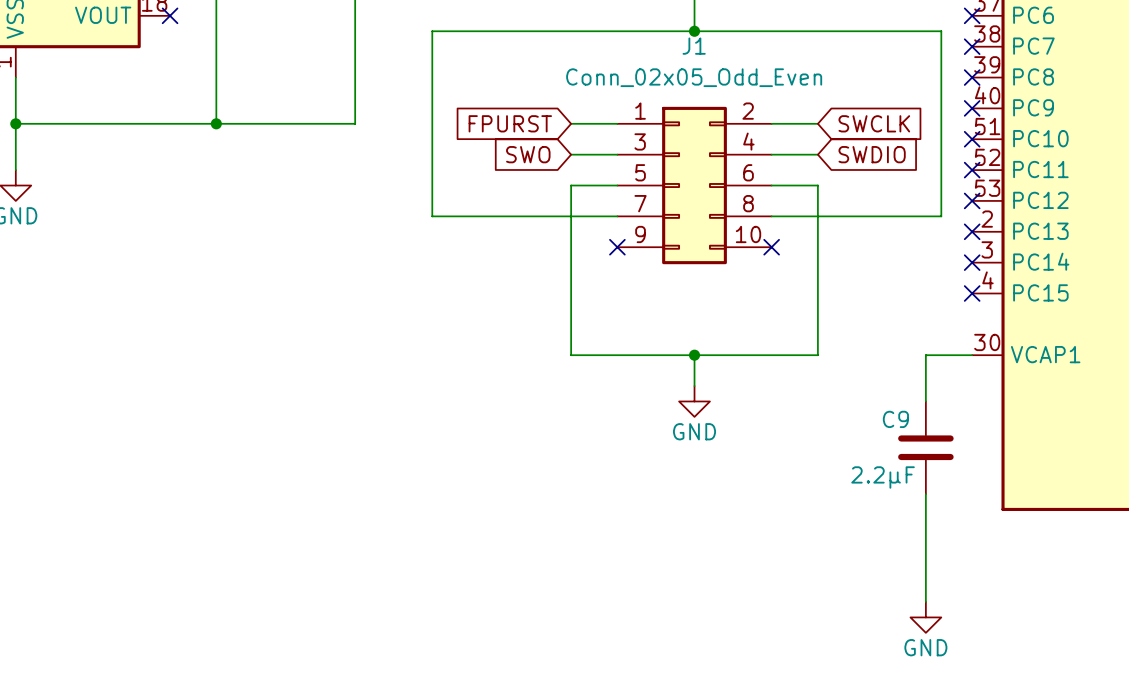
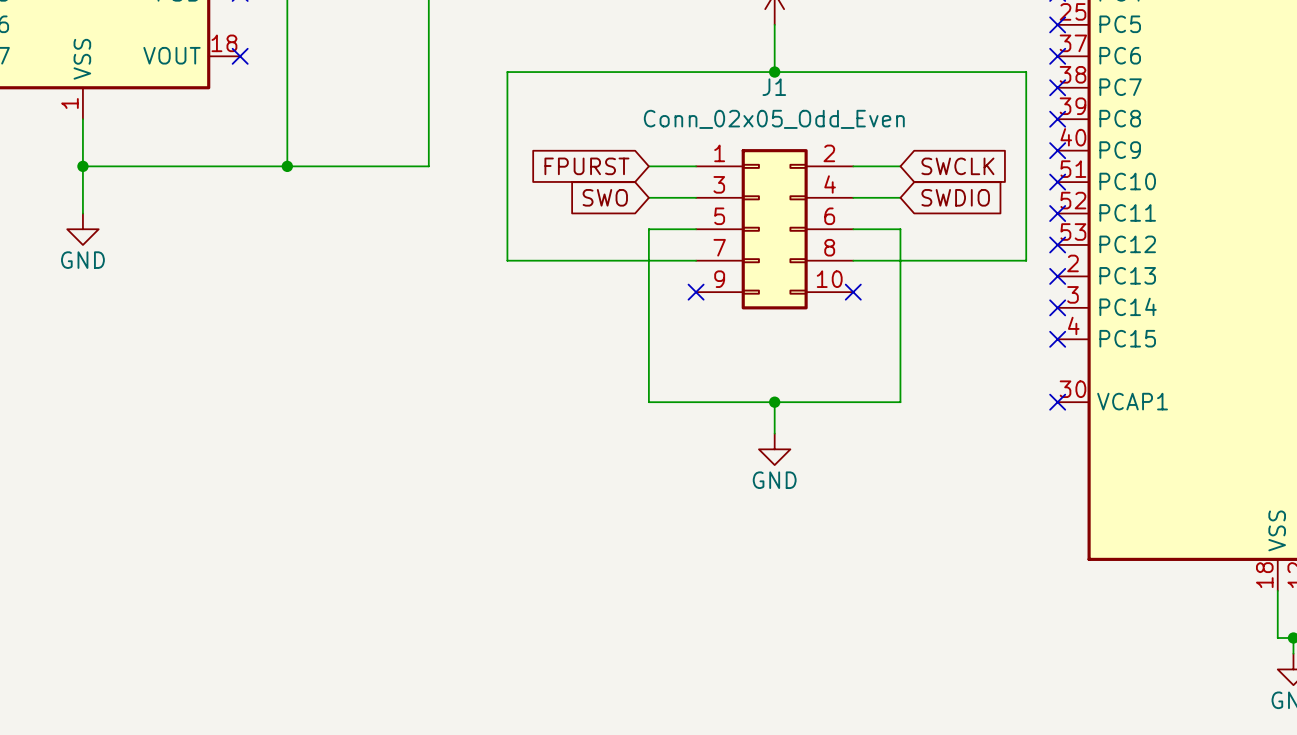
wire: (972, 355) (925, 355) (925, 401) -> none
no-connect mark: none -> (1057, 402)
C9: 2.2μF (925, 447) -> none
wire: (925, 494) (925, 602) -> none
power symbol: GND (925, 617) -> none

